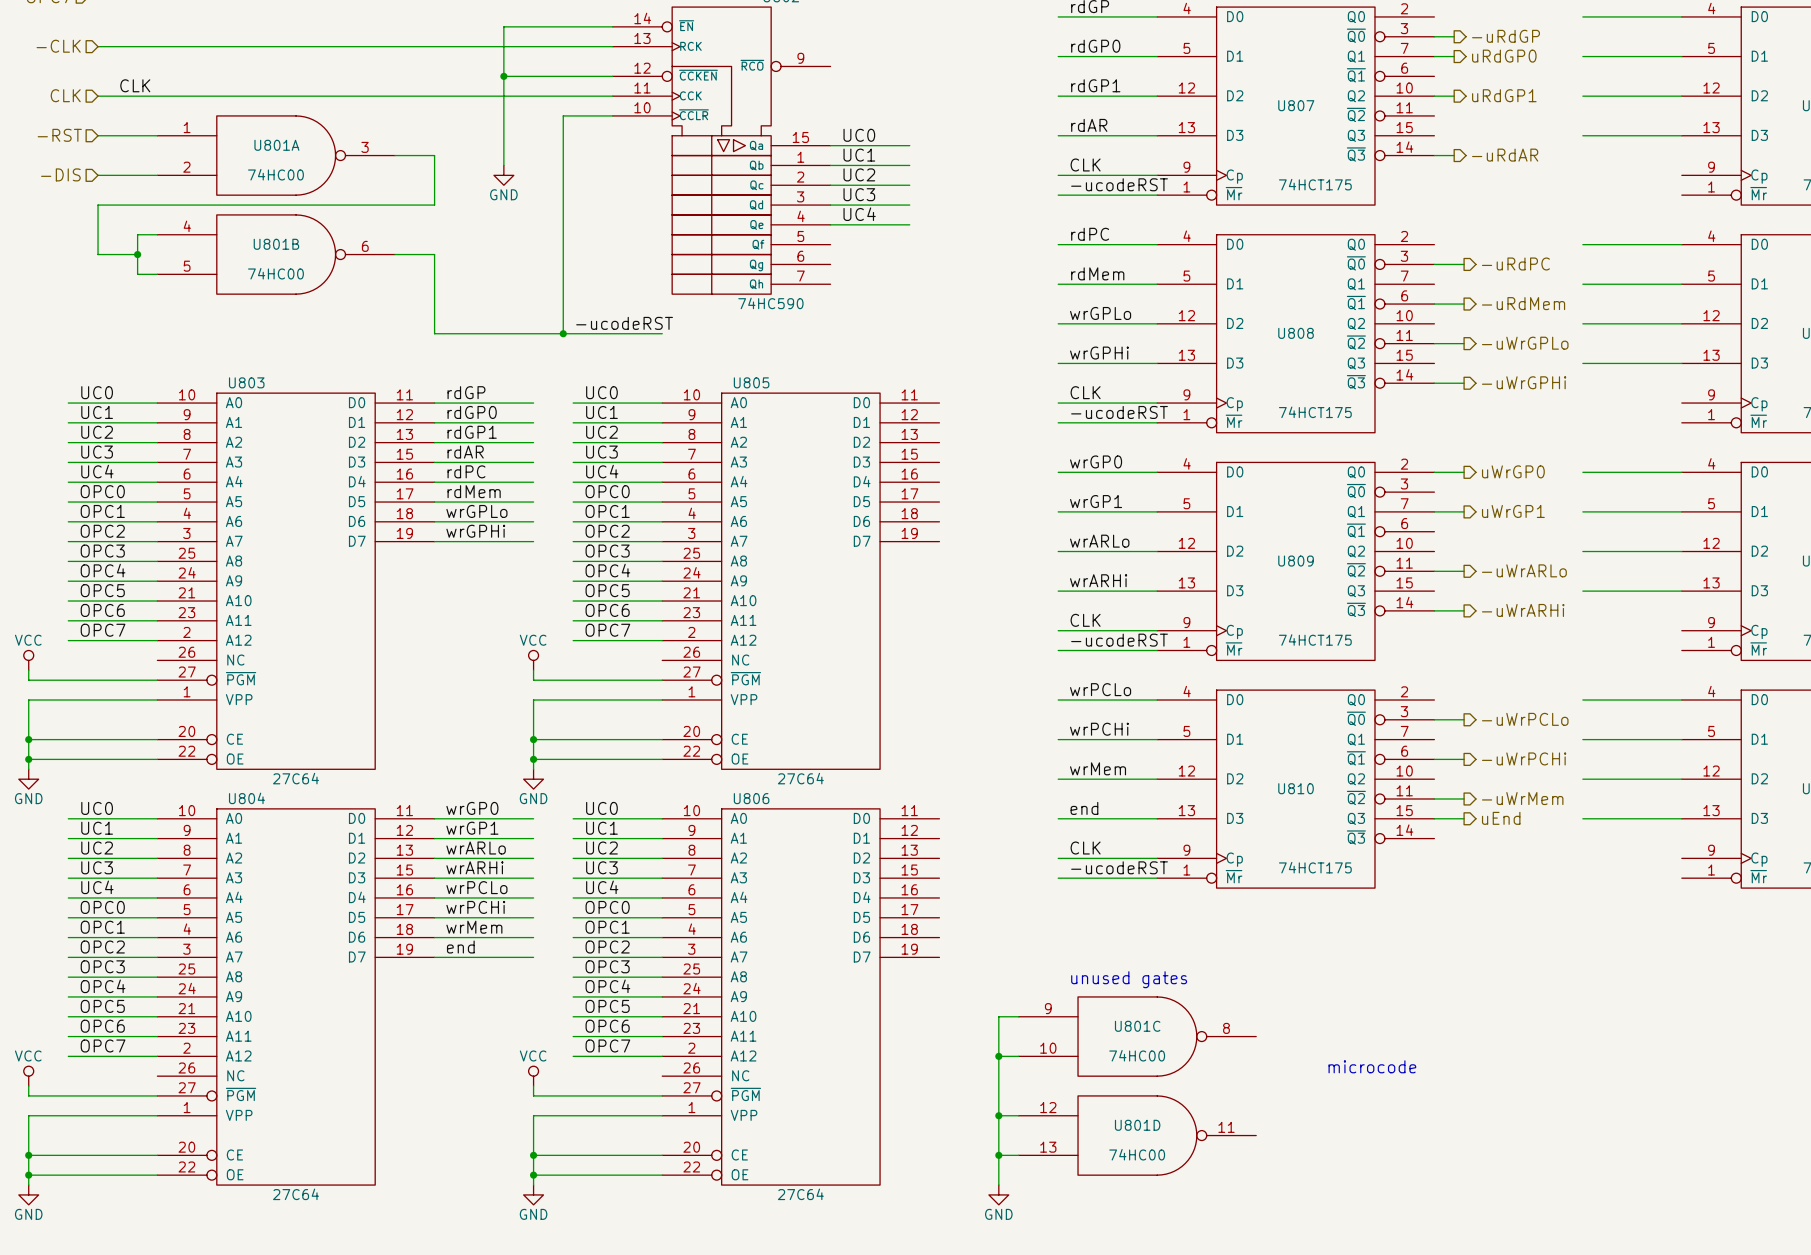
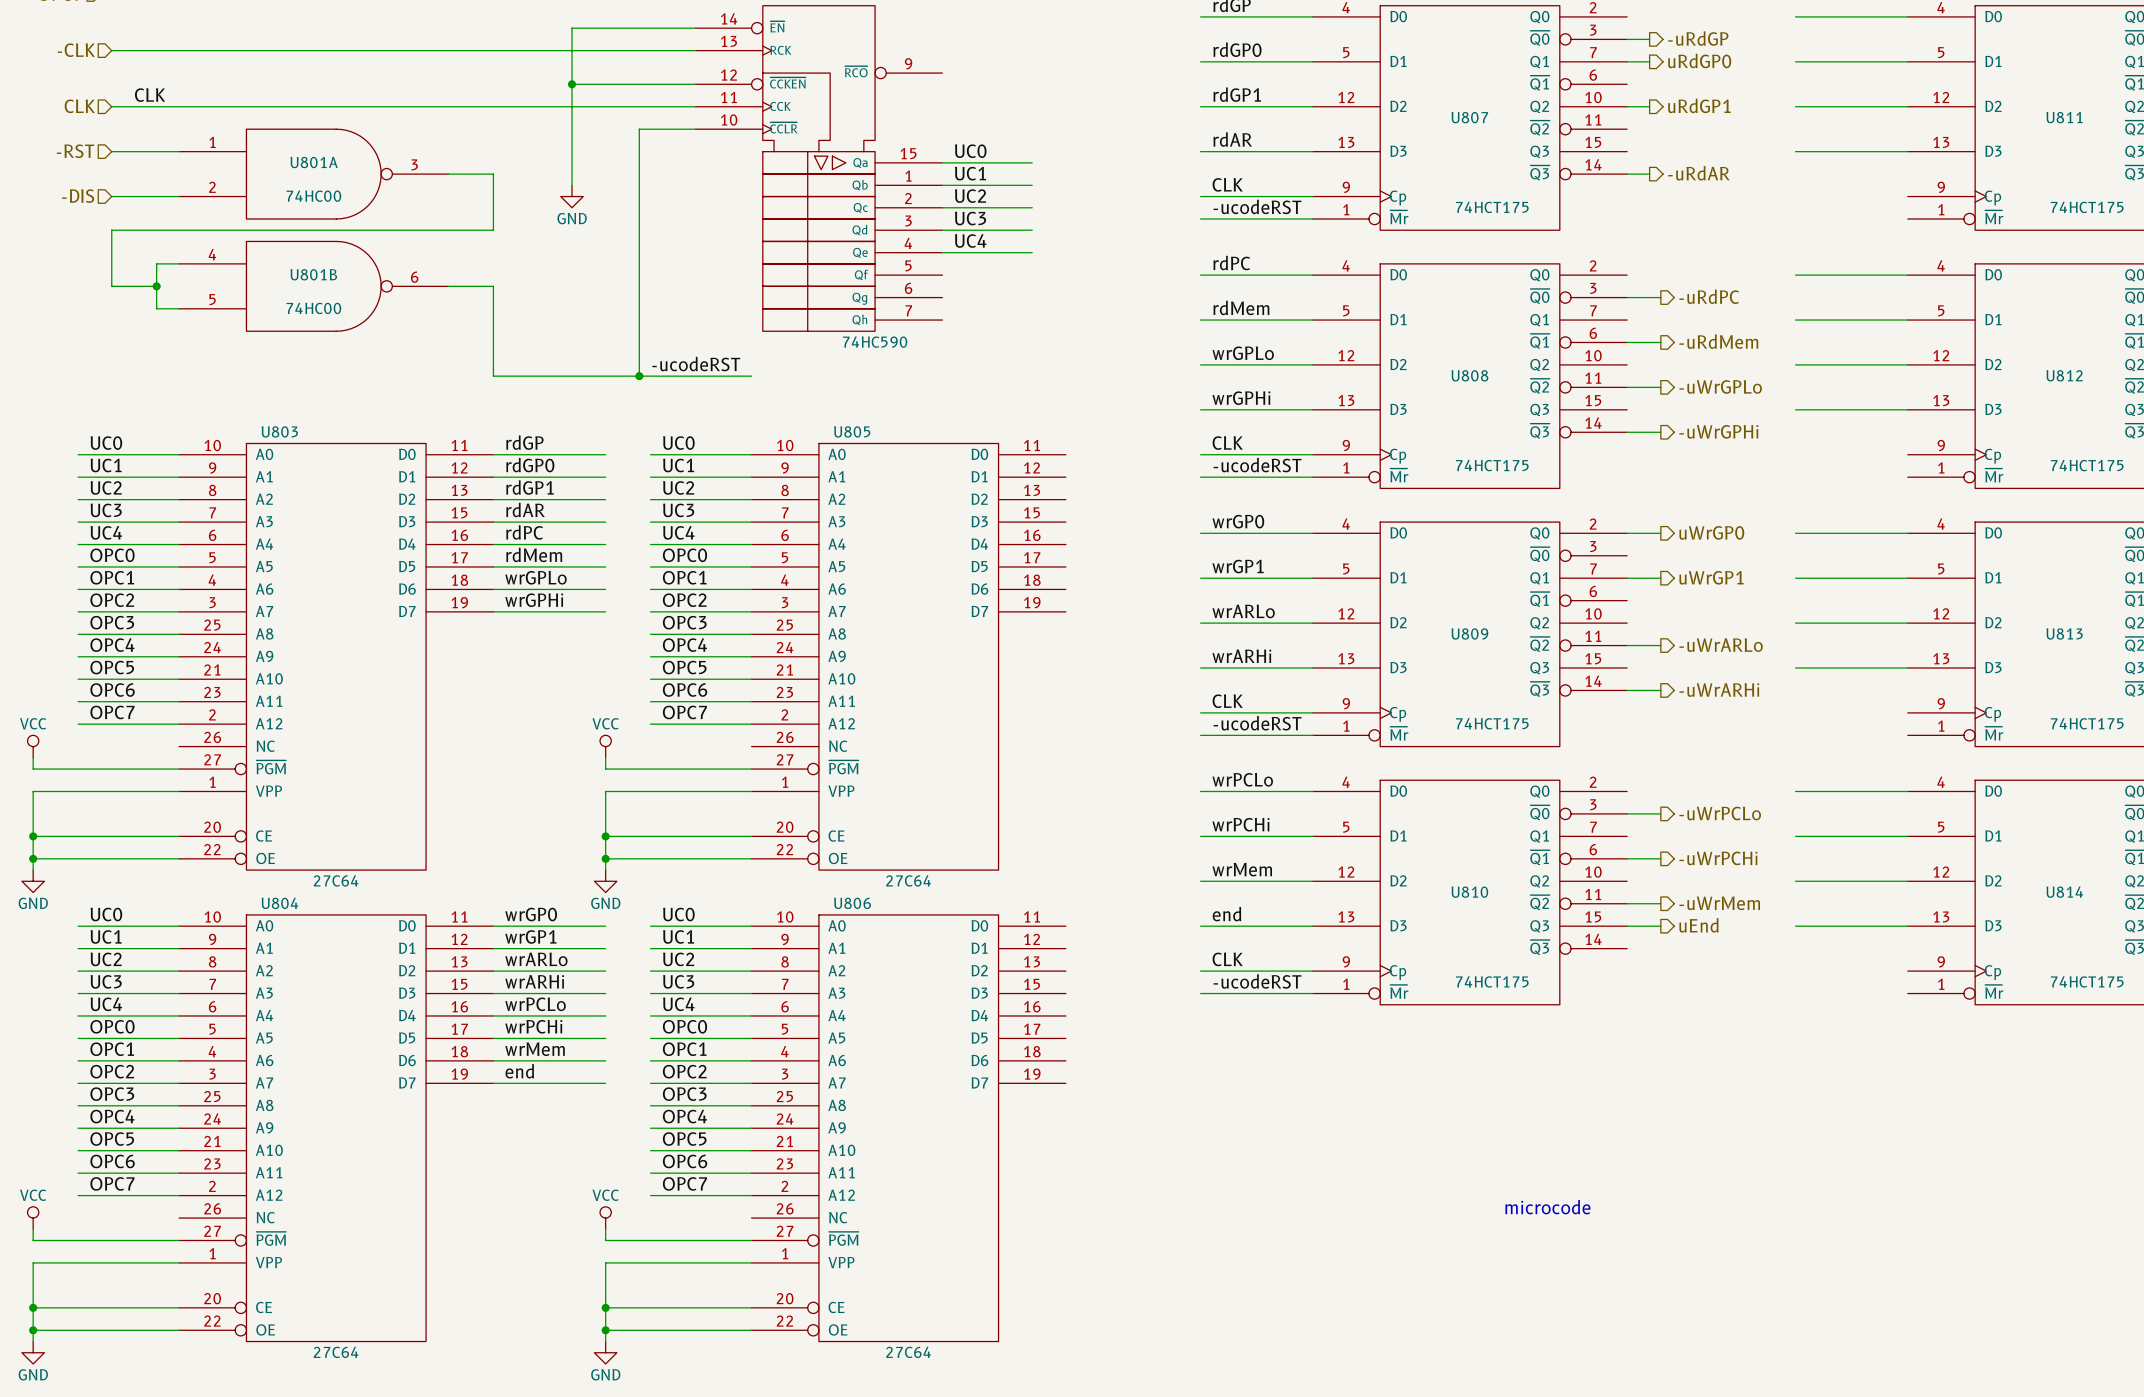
text: unused gates (1129, 979) -> none
wire: (1018, 1016) (998, 1016) (998, 1185) -> none
U801C: 74HC00 (1137, 1036) -> none
wire: (998, 1056) (1018, 1056) -> none
junction: (998, 1056) -> none
wire: (998, 1115) (1018, 1115) -> none
junction: (998, 1115) -> none
U801D: 74HC00 (1137, 1135) -> none
wire: (998, 1155) (1018, 1155) -> none
junction: (998, 1155) -> none
power symbol: GND (998, 1194) -> none

